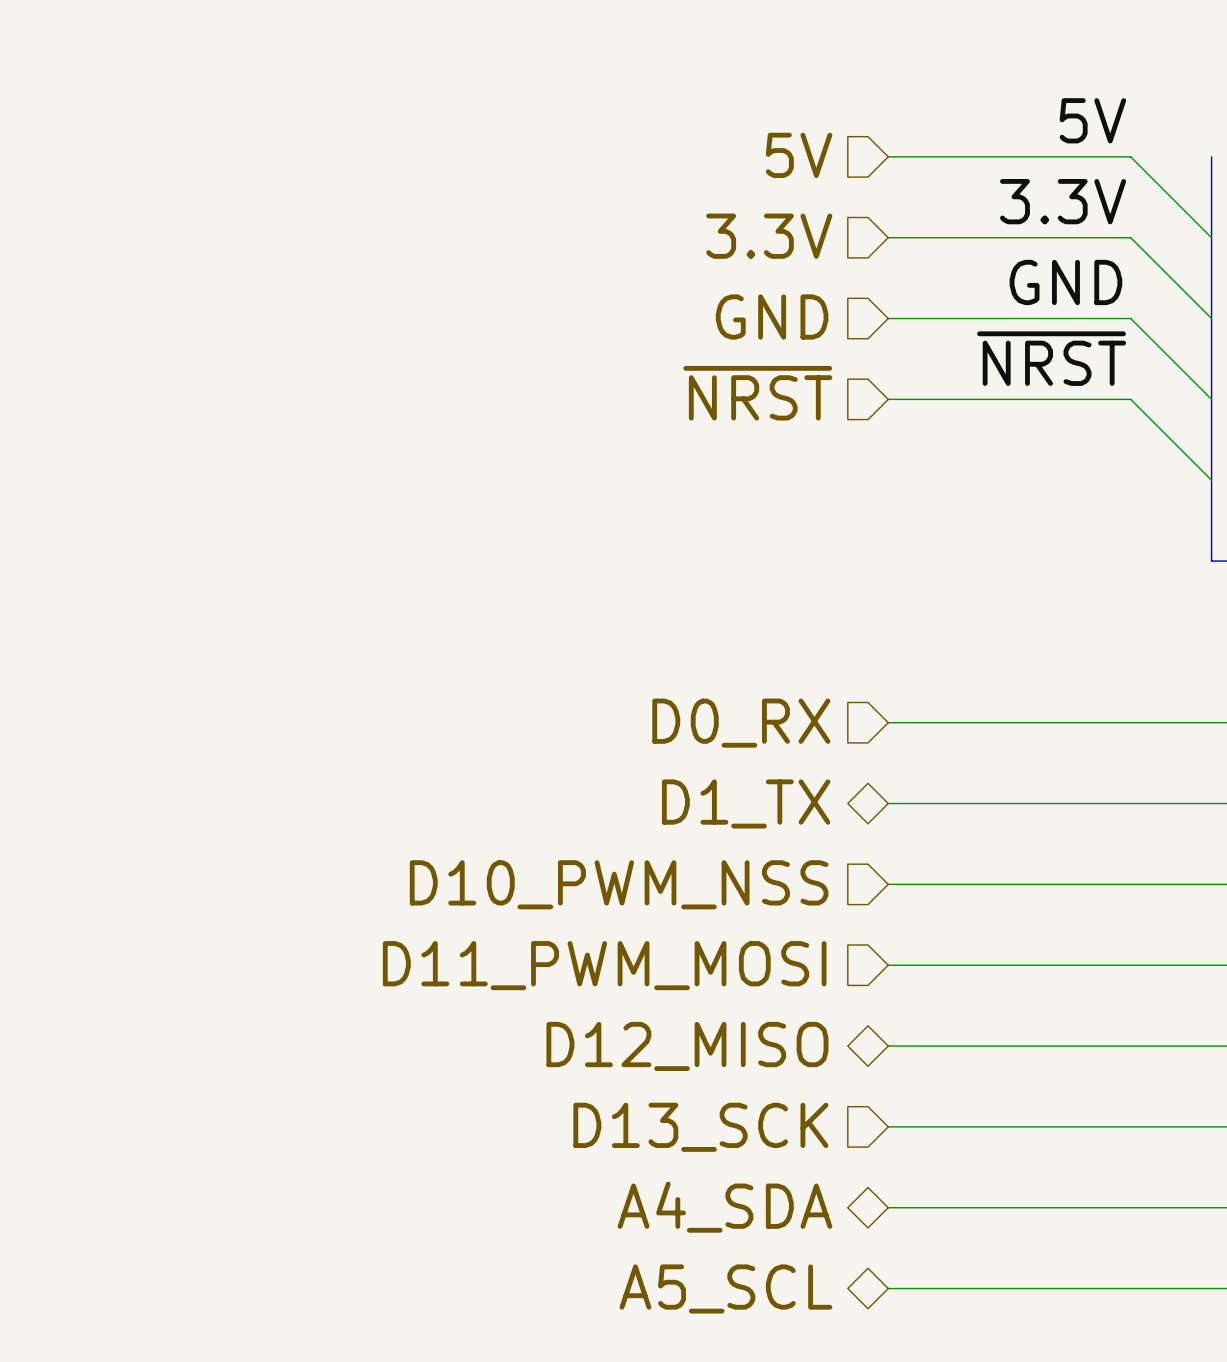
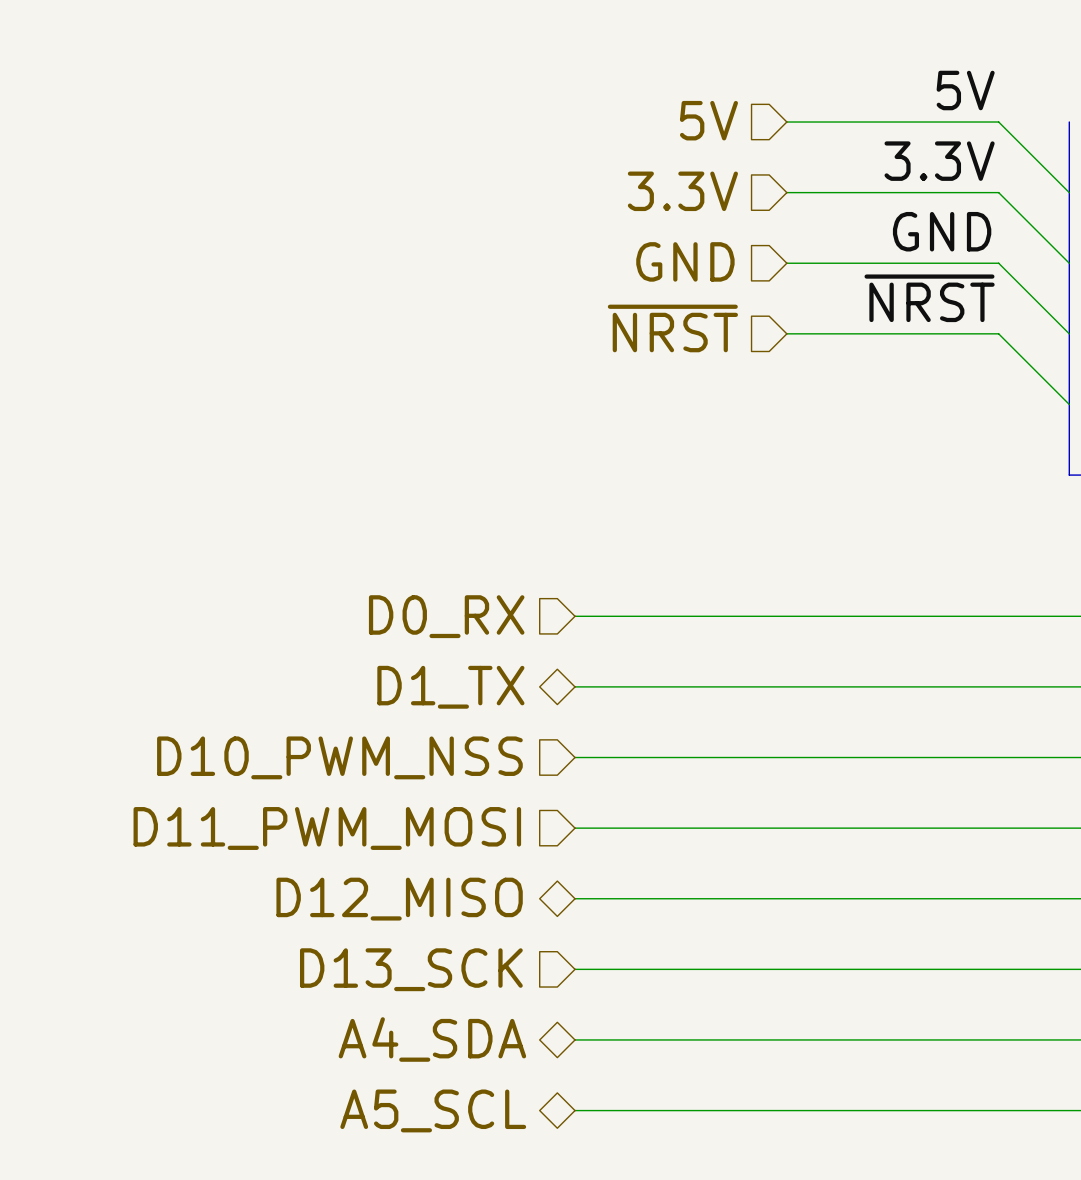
wire: none -> (575, 616) (786, 616)
hierarchical label position: D0_RX (741, 723) -> D0_RX (446, 616)
wire: none -> (575, 686) (786, 686)
hierarchical label position: D1_TX (746, 803) -> D1_TX (450, 687)
hierarchical label position: D10_PWM_NSS (619, 884) -> D10_PWM_NSS (339, 757)
wire: none -> (575, 757) (786, 757)
hierarchical label position: D11_PWM_MOSI (604, 965) -> D11_PWM_MOSI (327, 828)
wire: none -> (575, 828) (786, 828)
wire: none -> (575, 898) (786, 898)
hierarchical label position: D12_MISO (687, 1046) -> D12_MISO (399, 899)
wire: none -> (575, 969) (786, 969)
hierarchical label position: D13_SCK (700, 1127) -> D13_SCK (411, 969)
wire: none -> (575, 1039) (786, 1039)
hierarchical label position: A4_SDA (724, 1207) -> A4_SDA (432, 1039)
wire: none -> (575, 1110) (786, 1110)
hierarchical label position: A5_SCL (725, 1288) -> A5_SCL (433, 1110)

